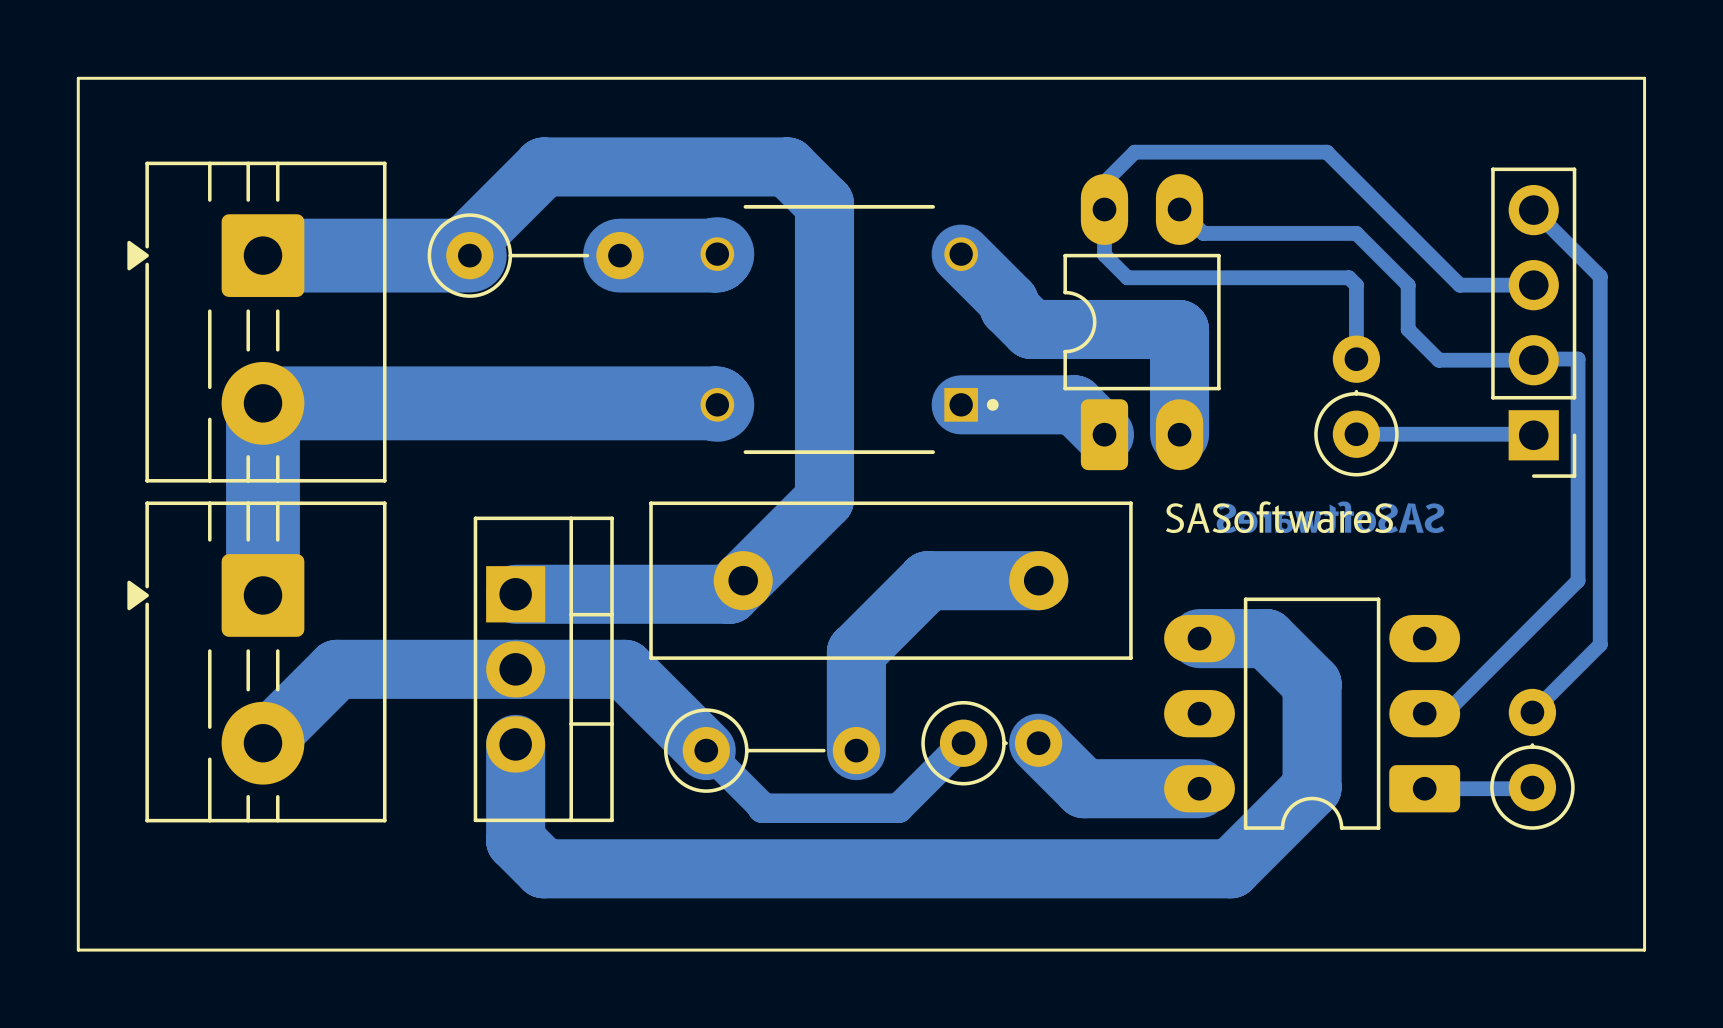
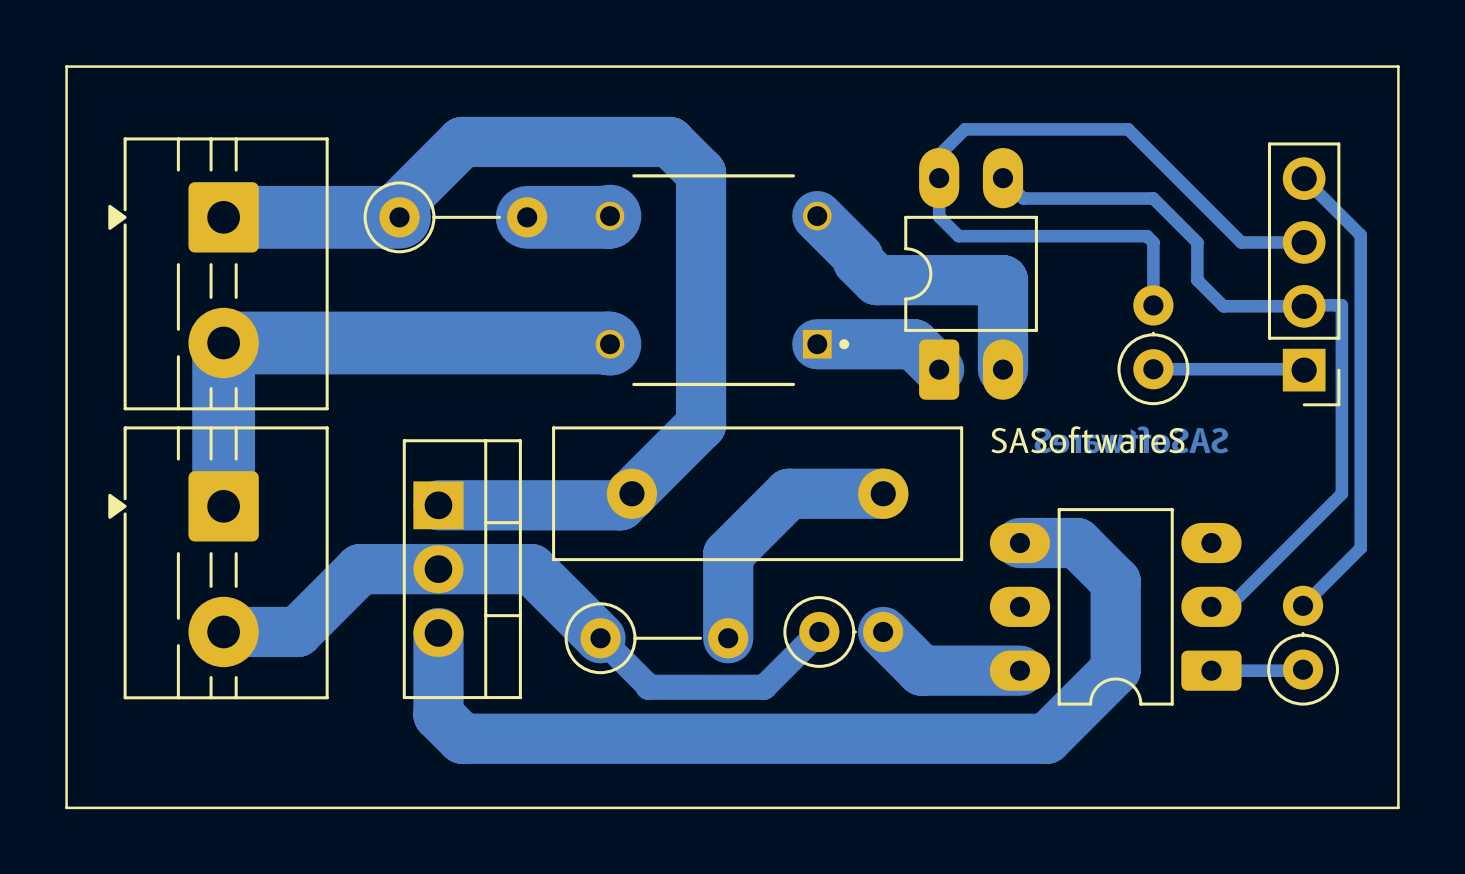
bottom track: (423, 669) (336, 669) (262, 743) -> (360, 569) (297, 631) (223, 631)

